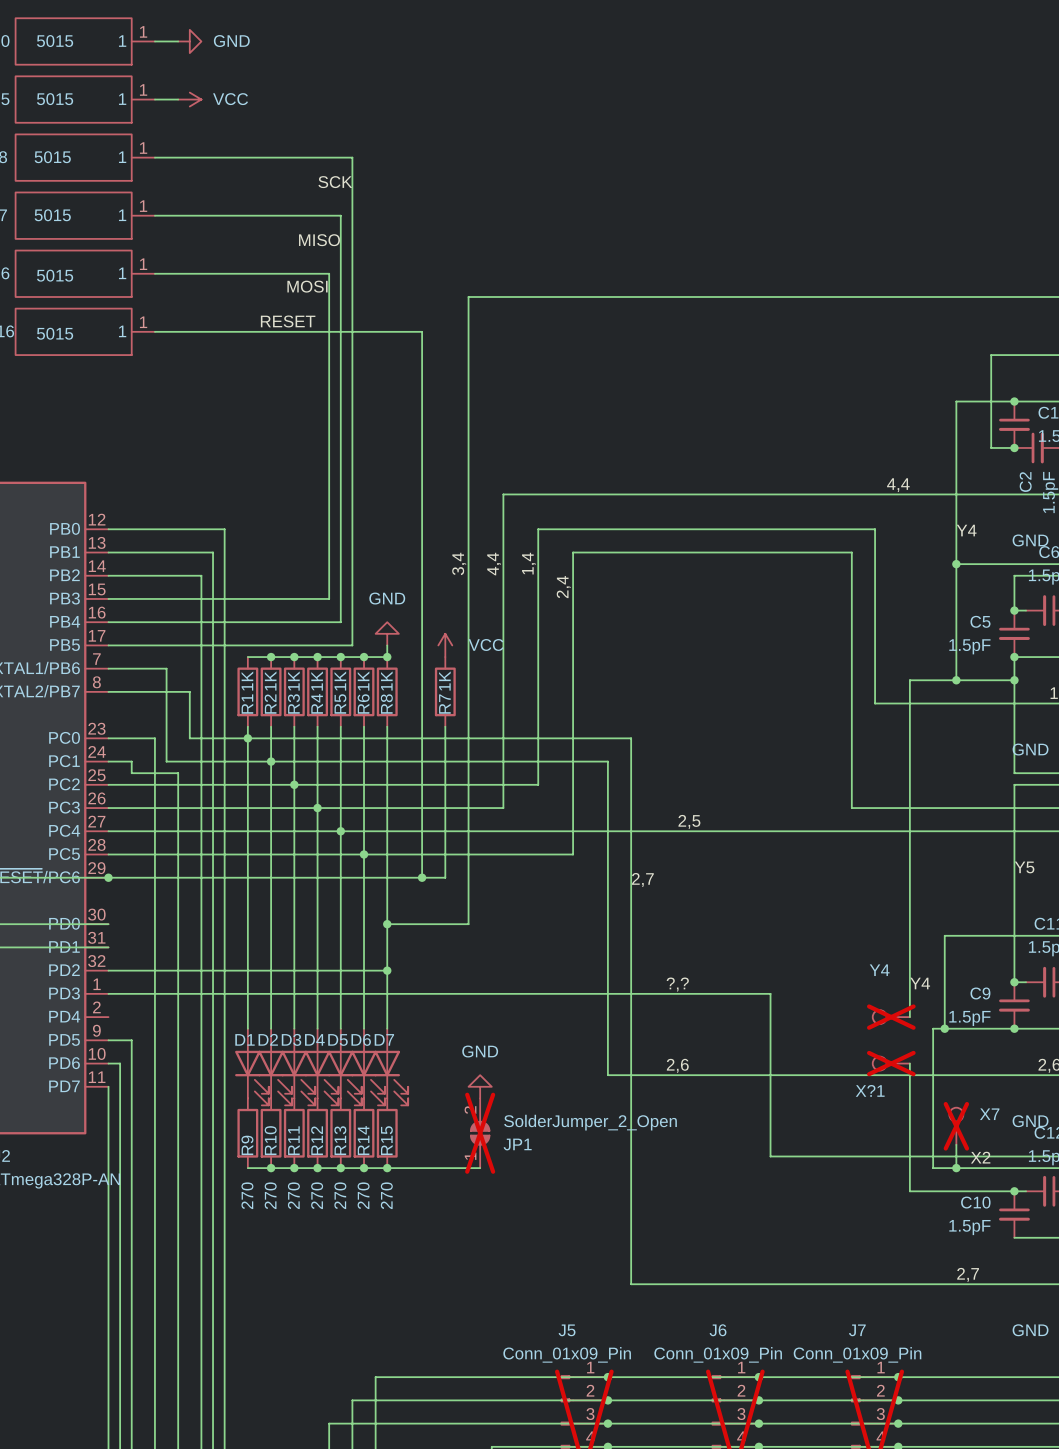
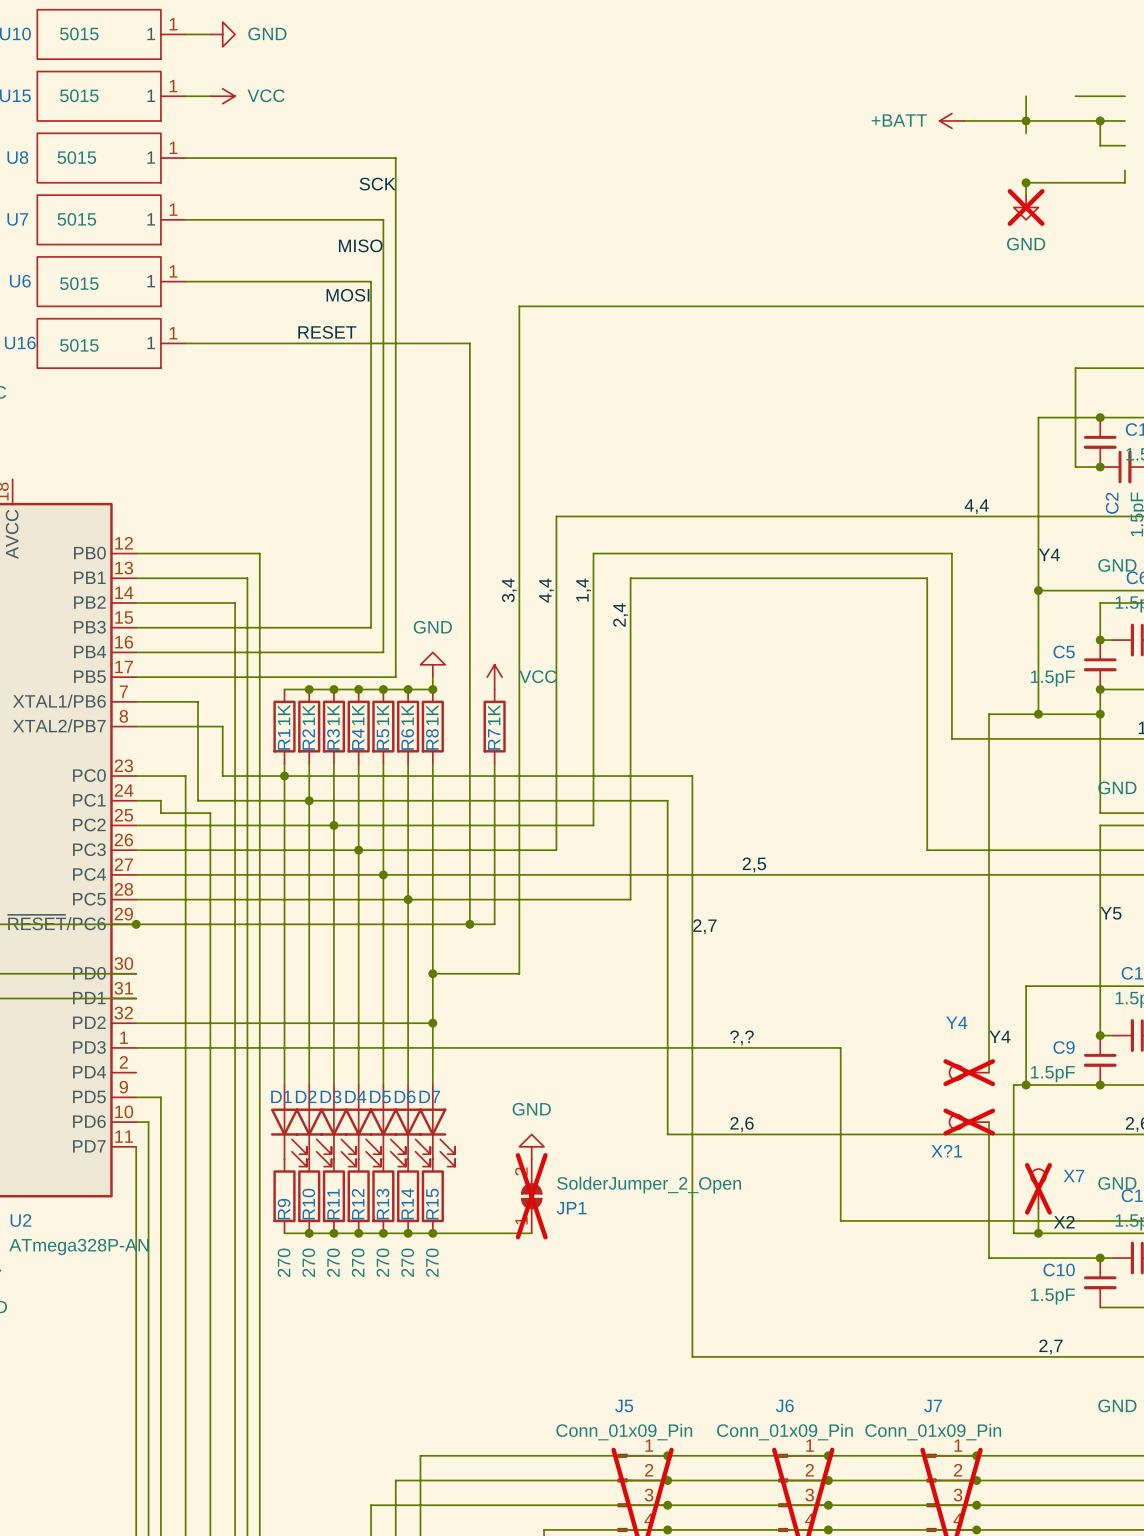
wire: none -> (1026, 96) (1026, 133)
wire: none -> (1075, 96) (1124, 96)
power symbol: none -> +BATT (951, 120)
wire: none -> (964, 120) (1124, 120)
junction: none -> (1026, 120)
wire: none -> (1100, 120) (1100, 145) (1124, 145)
junction: none -> (1100, 120)
wire: none -> (1124, 170) (1124, 182) (1026, 182) (1026, 195)
junction: none -> (1026, 182)
power symbol: none -> GND (1026, 207)

